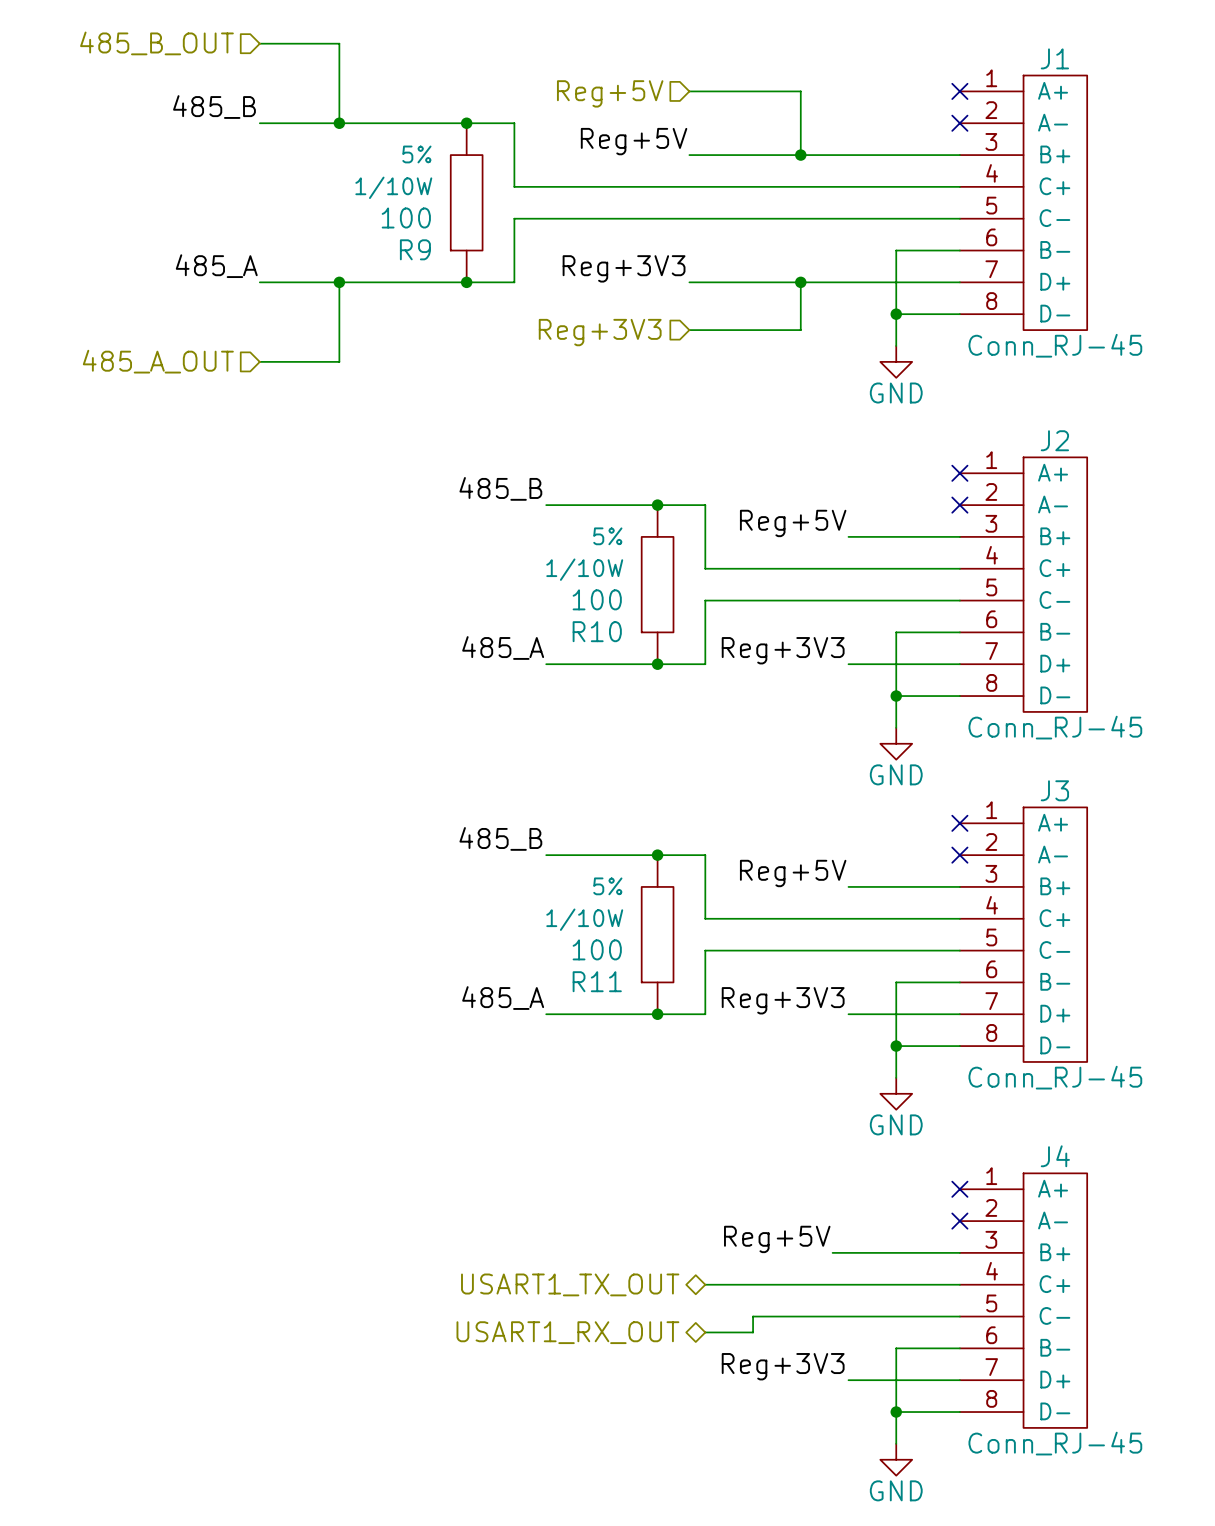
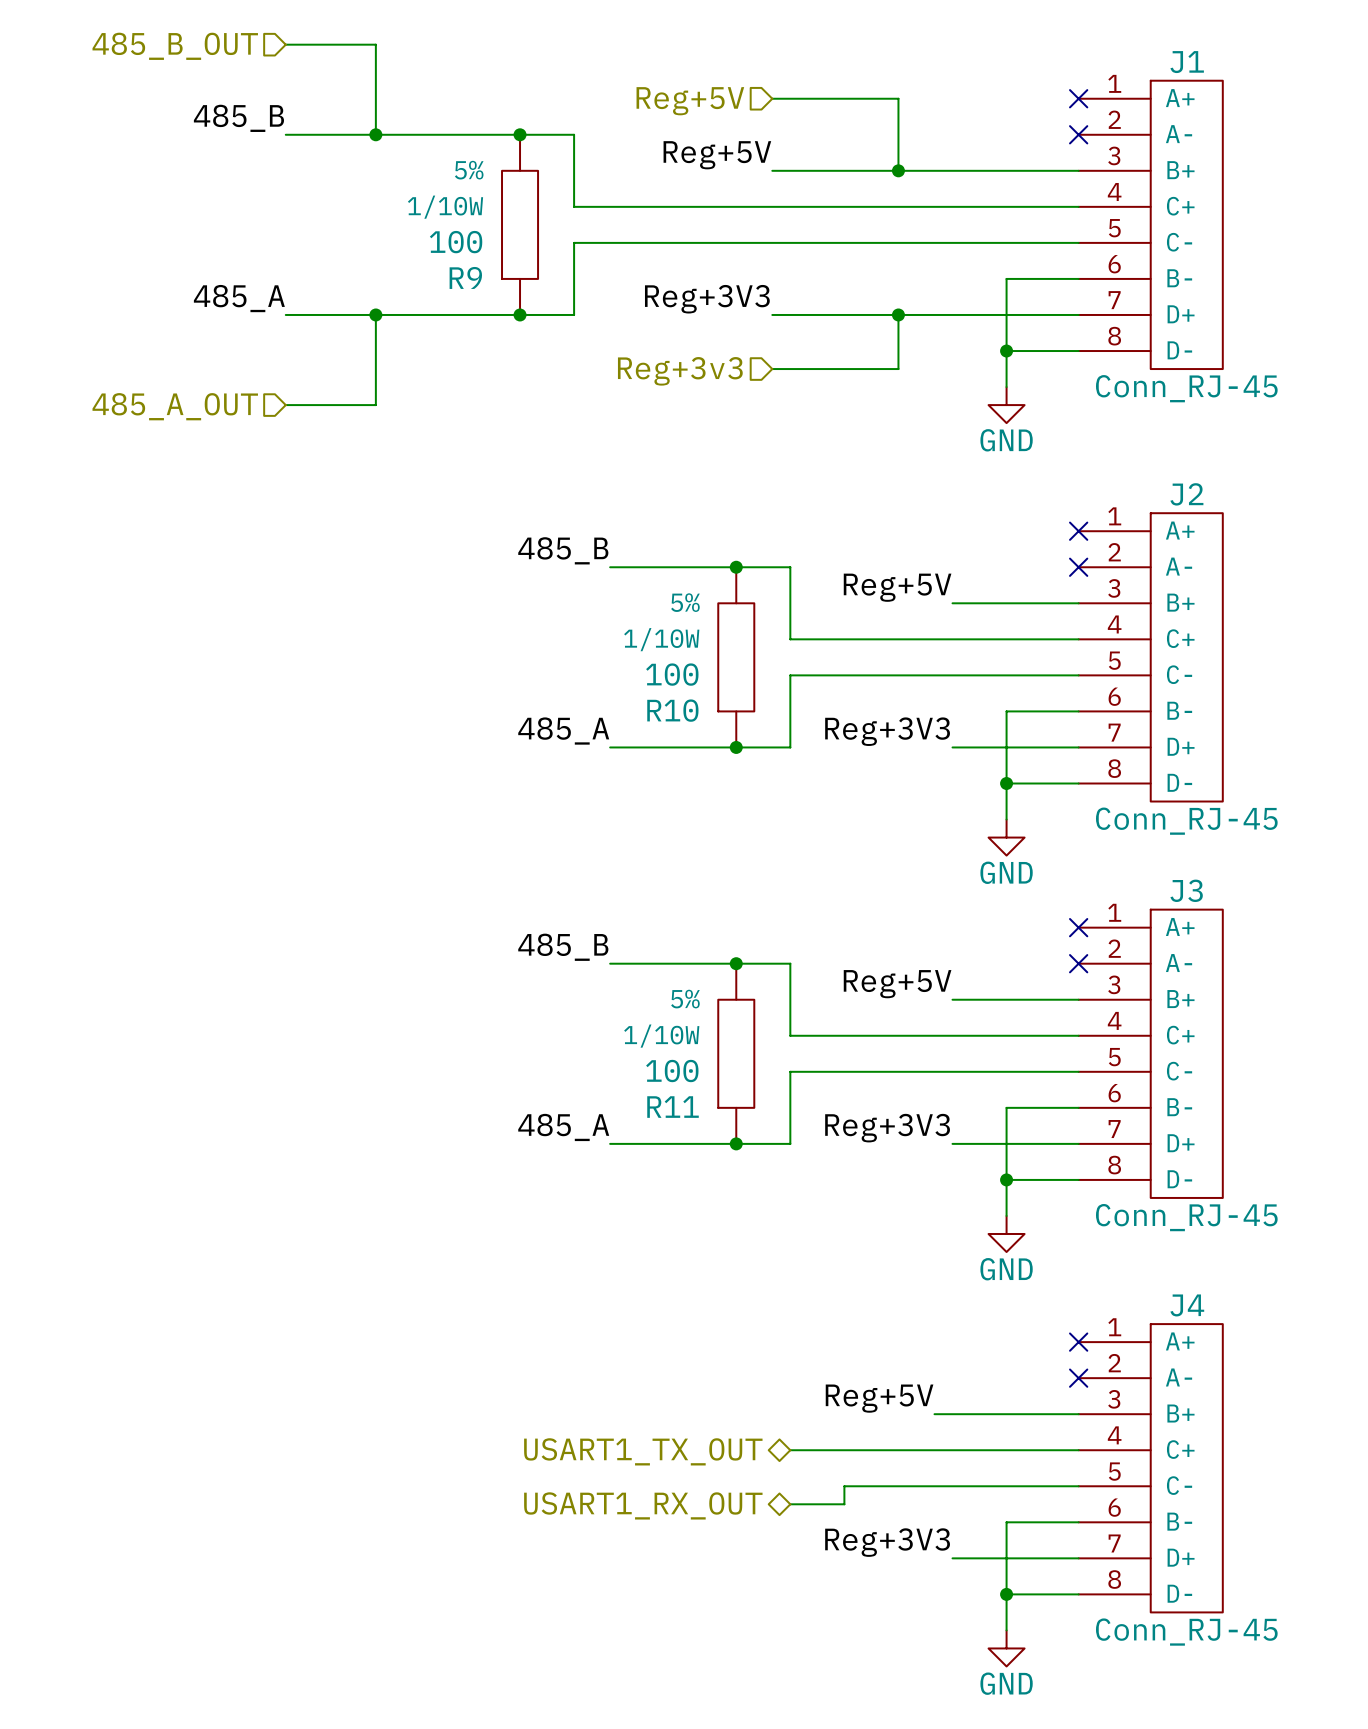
hierarchical label: Reg+3V3 (600, 332) -> Reg+3v3 (680, 371)

